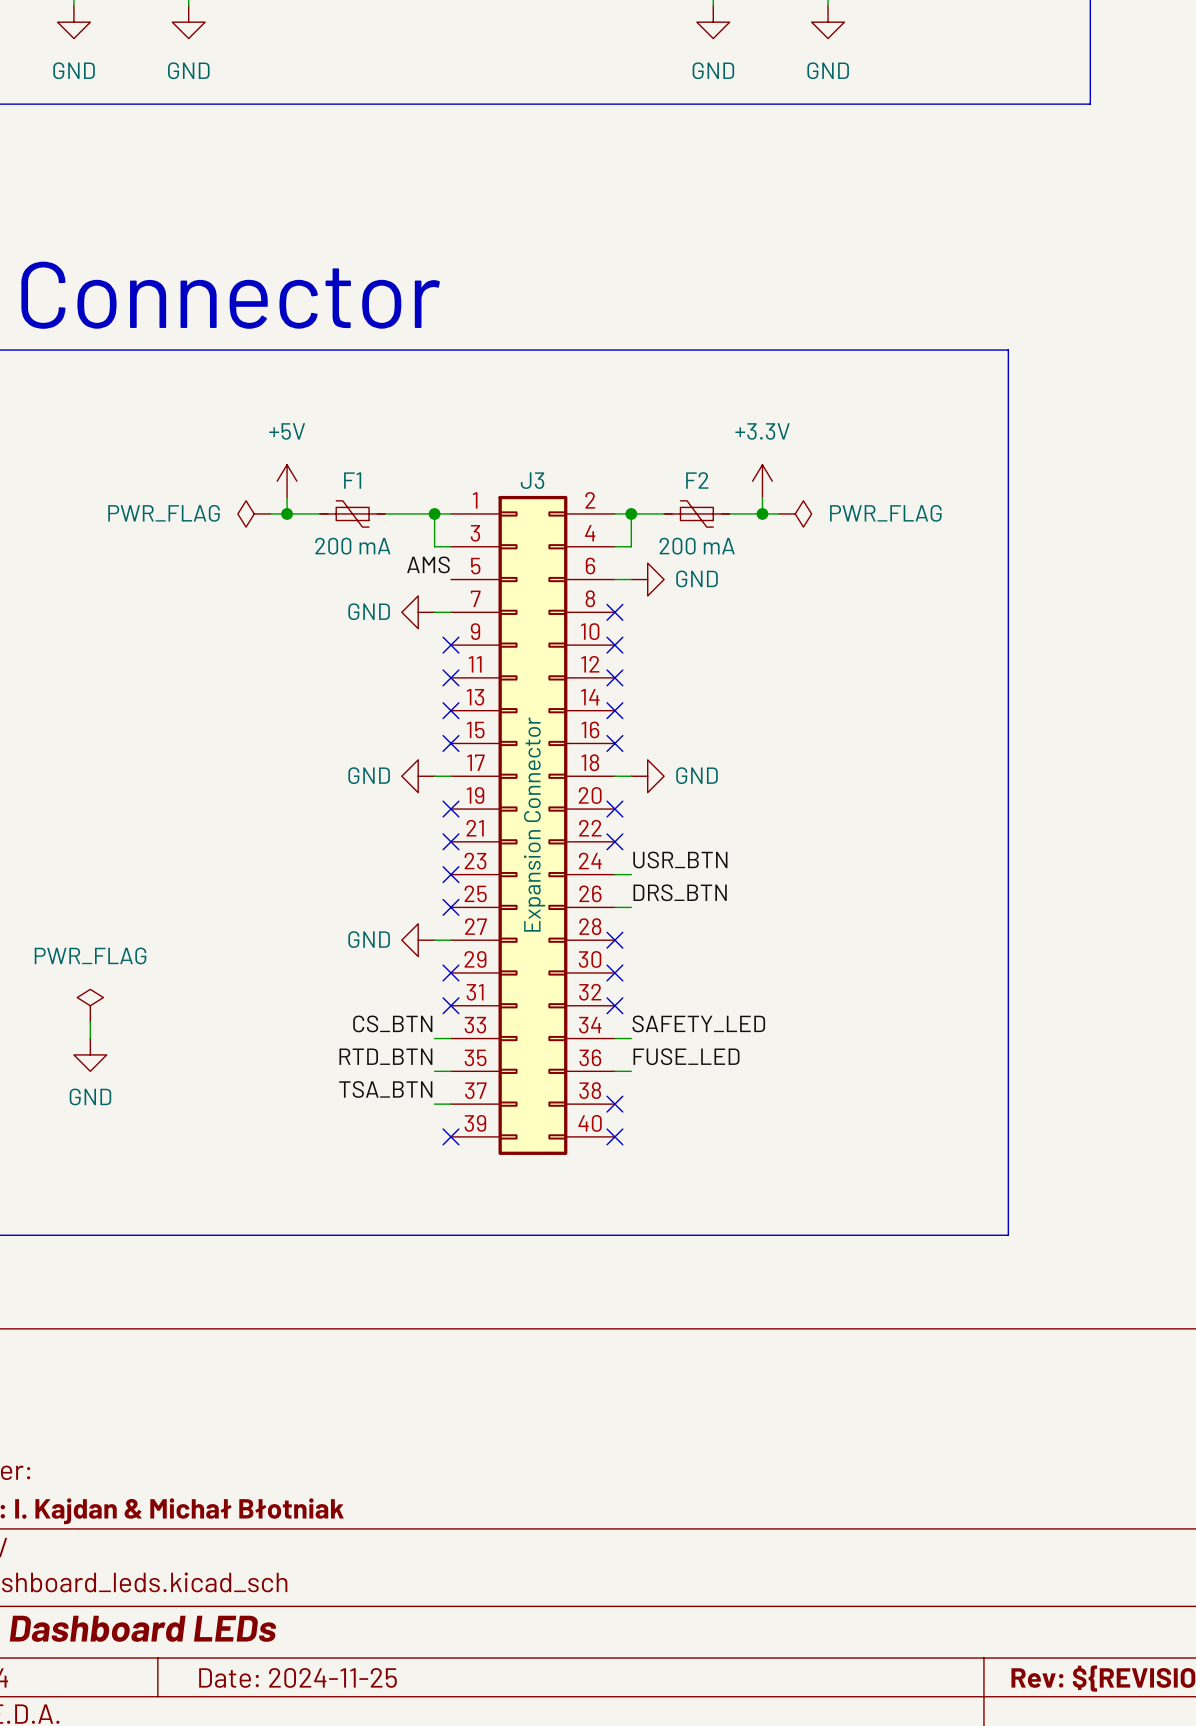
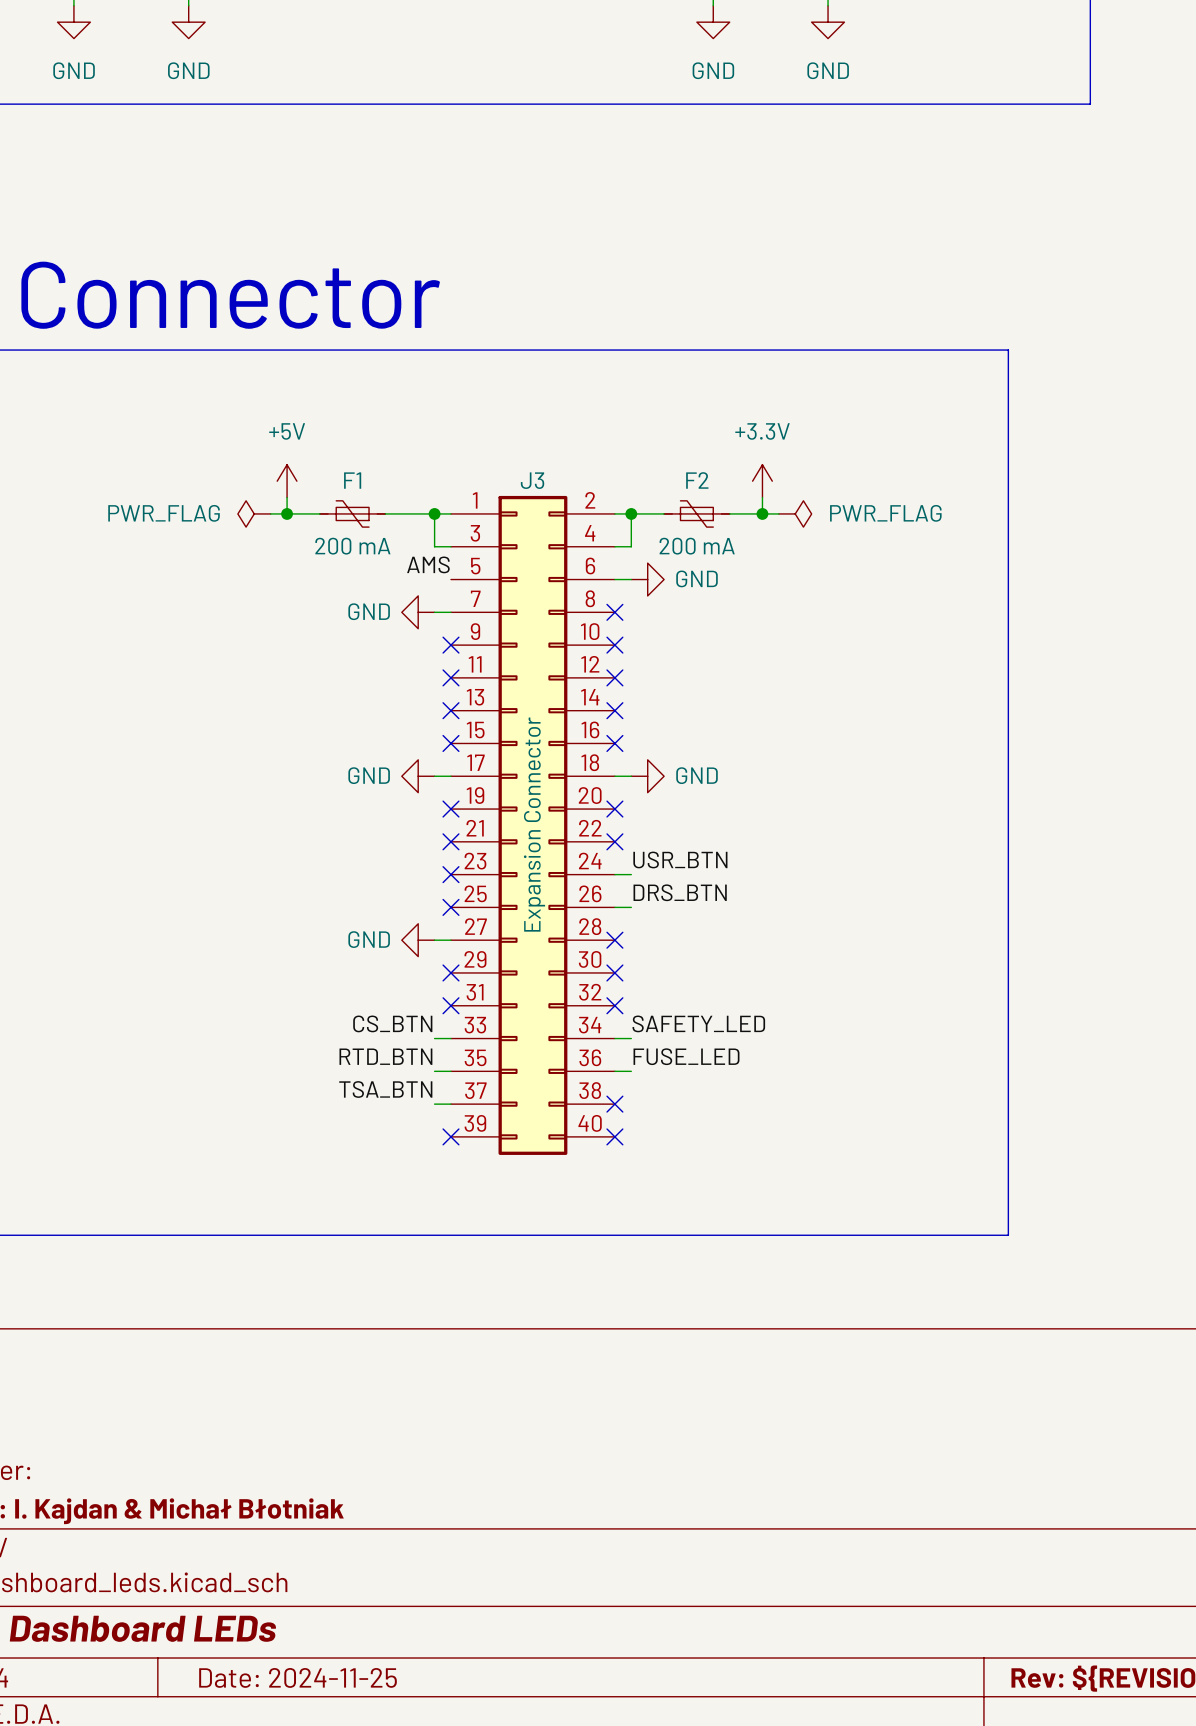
power symbol: PWR_FLAG (90, 1005) -> none
wire: (90, 1022) (90, 1038) -> none
power symbol: GND (90, 1054) -> none

